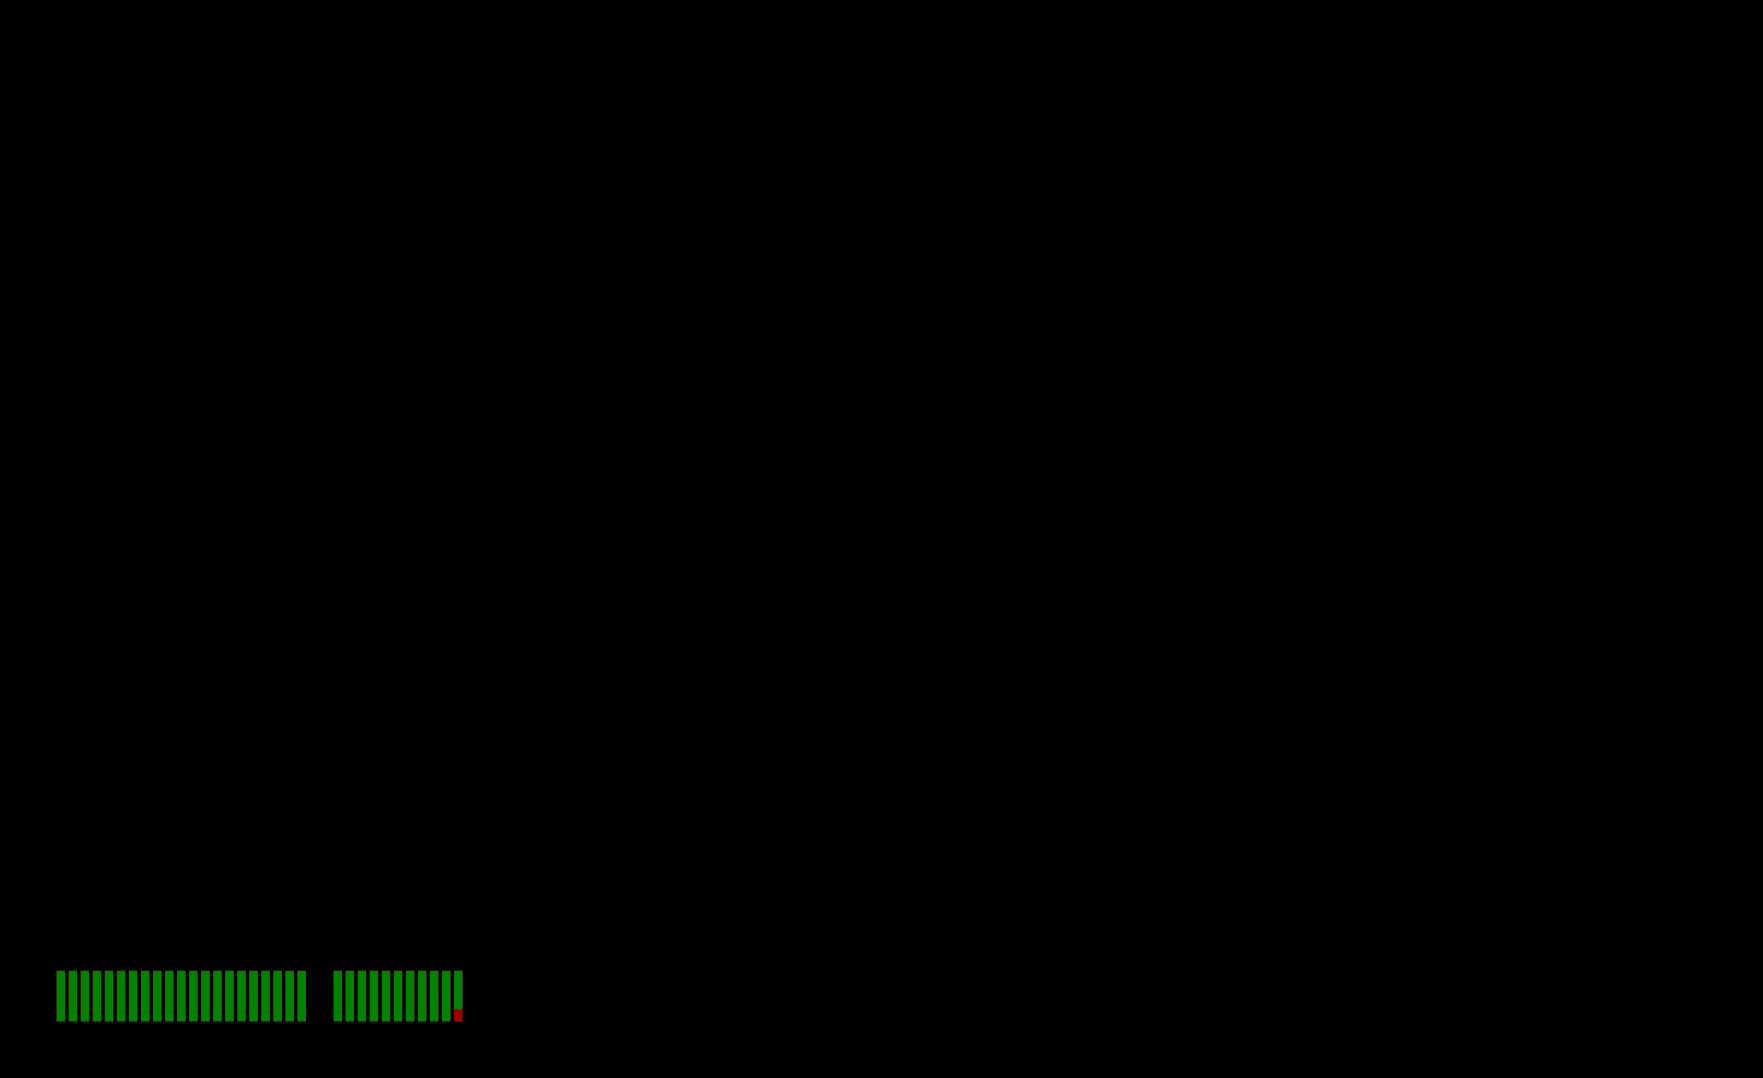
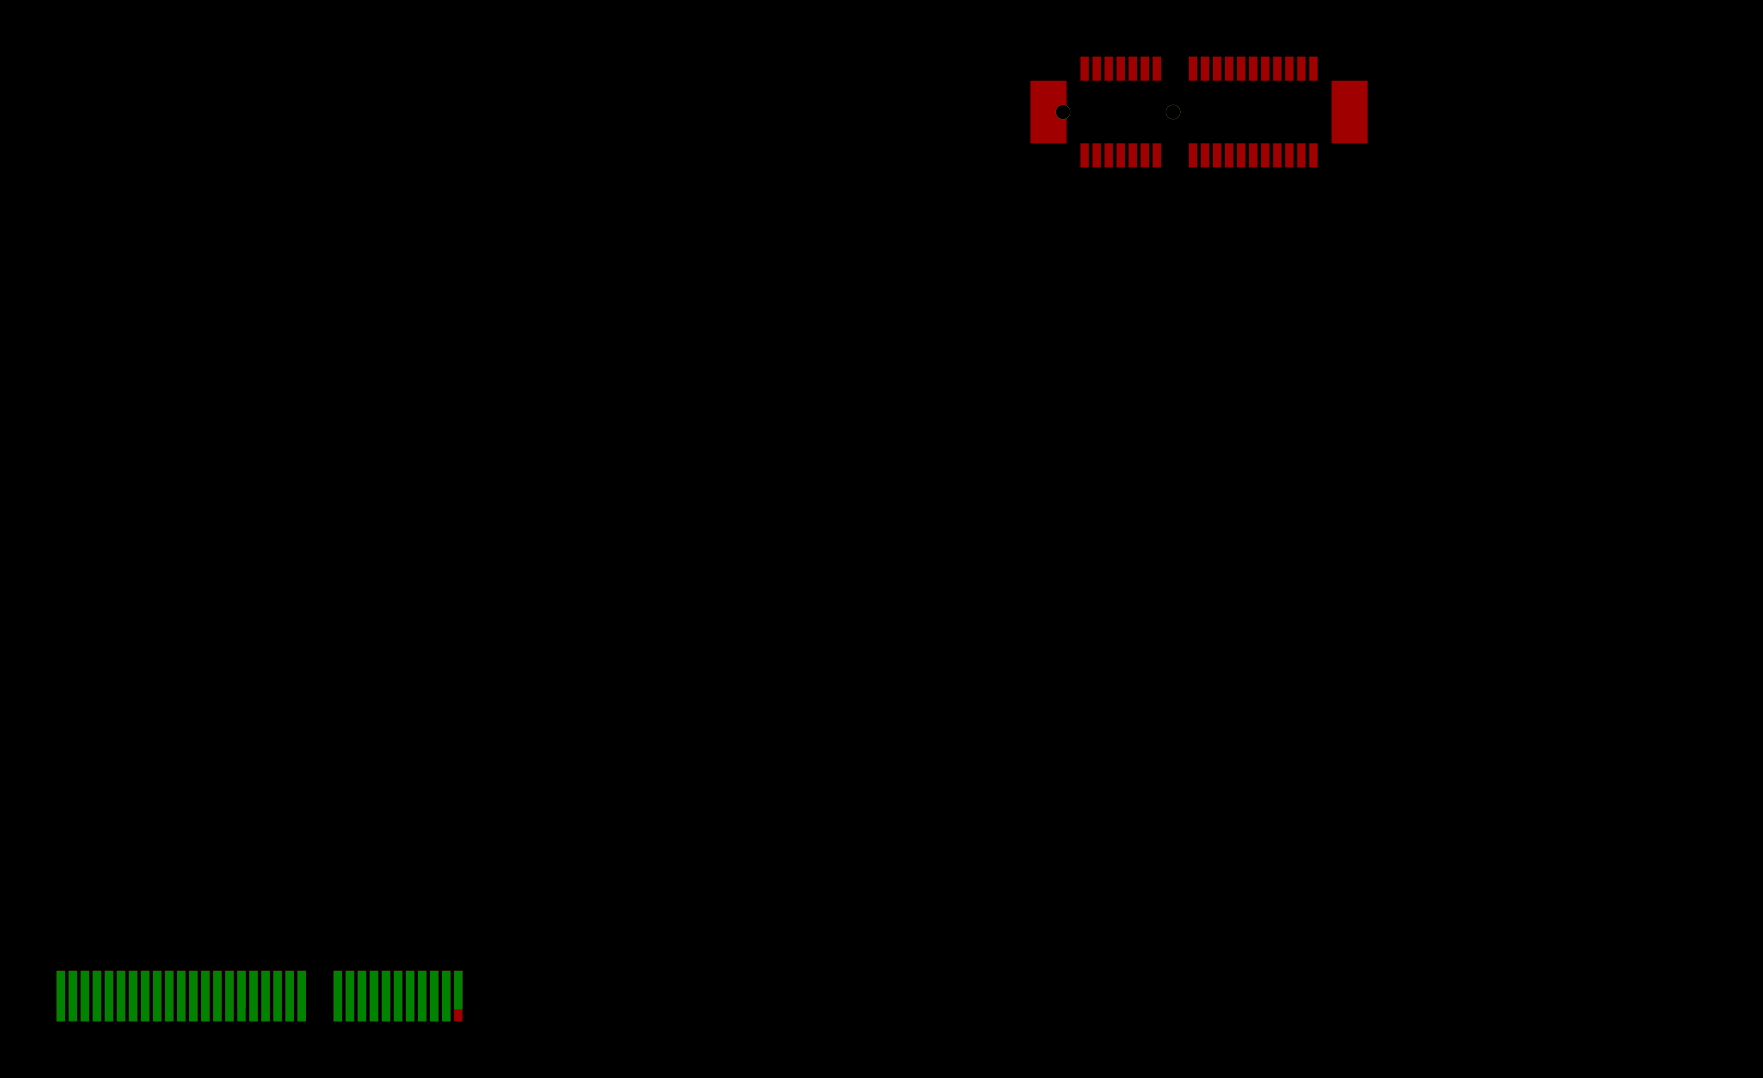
part: none -> (1199, 112)

